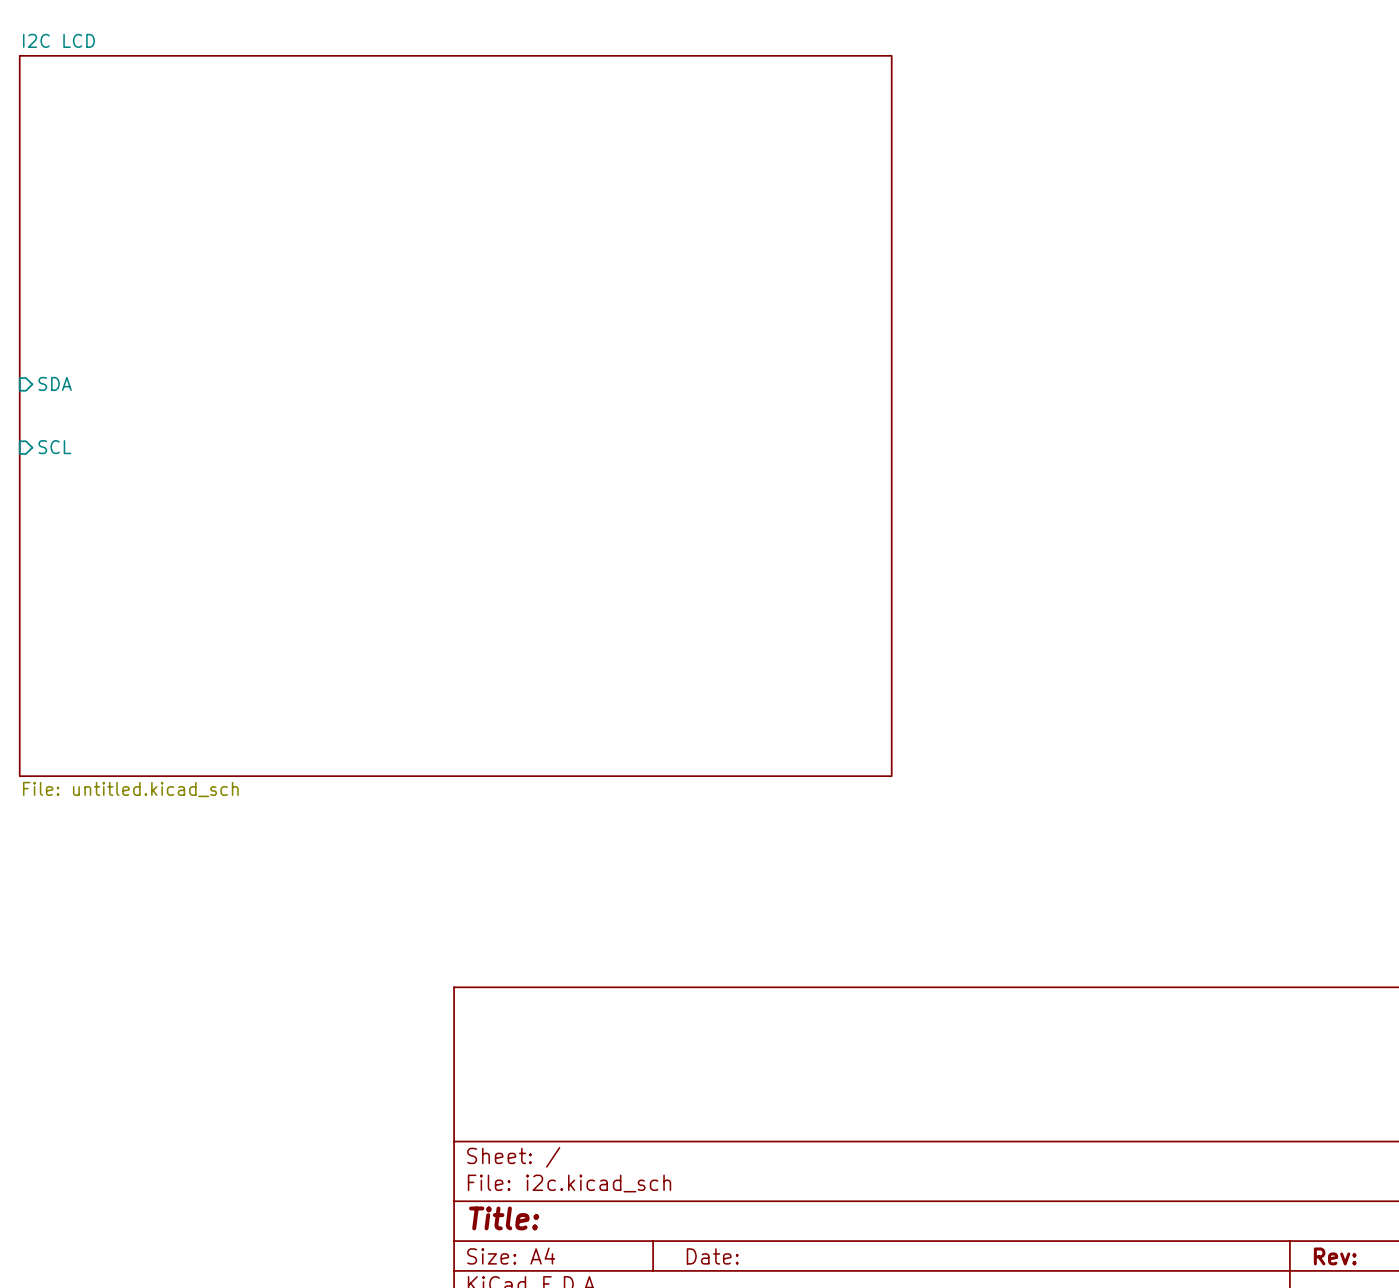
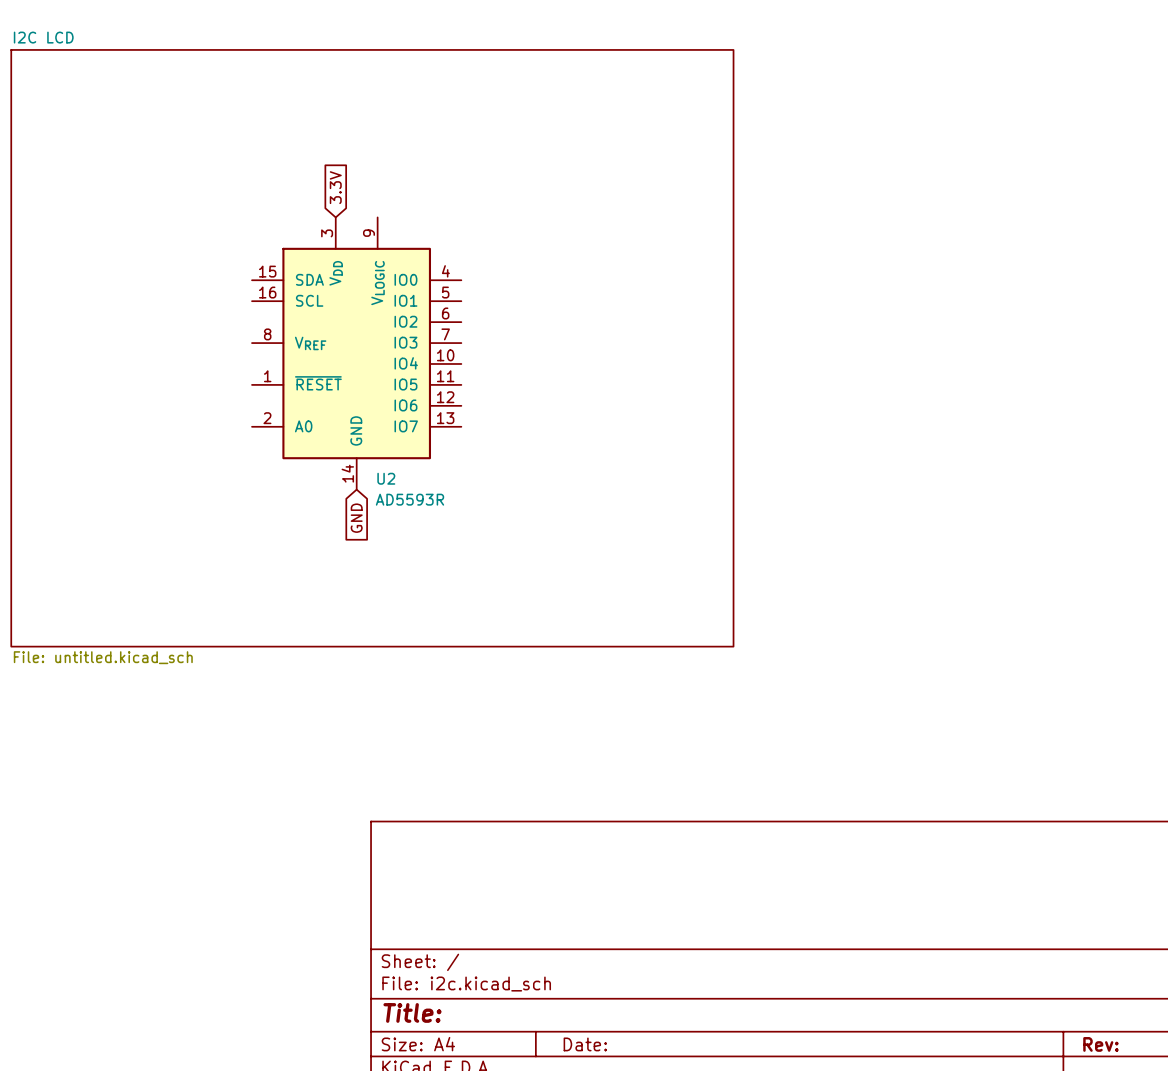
global label: none -> 3.3V (335, 187)
sheet pin: SDA (55, 383) -> none
U2: none -> AD5593R (356, 353)
sheet pin: SCL (54, 447) -> none
global label: none -> GND (356, 518)

